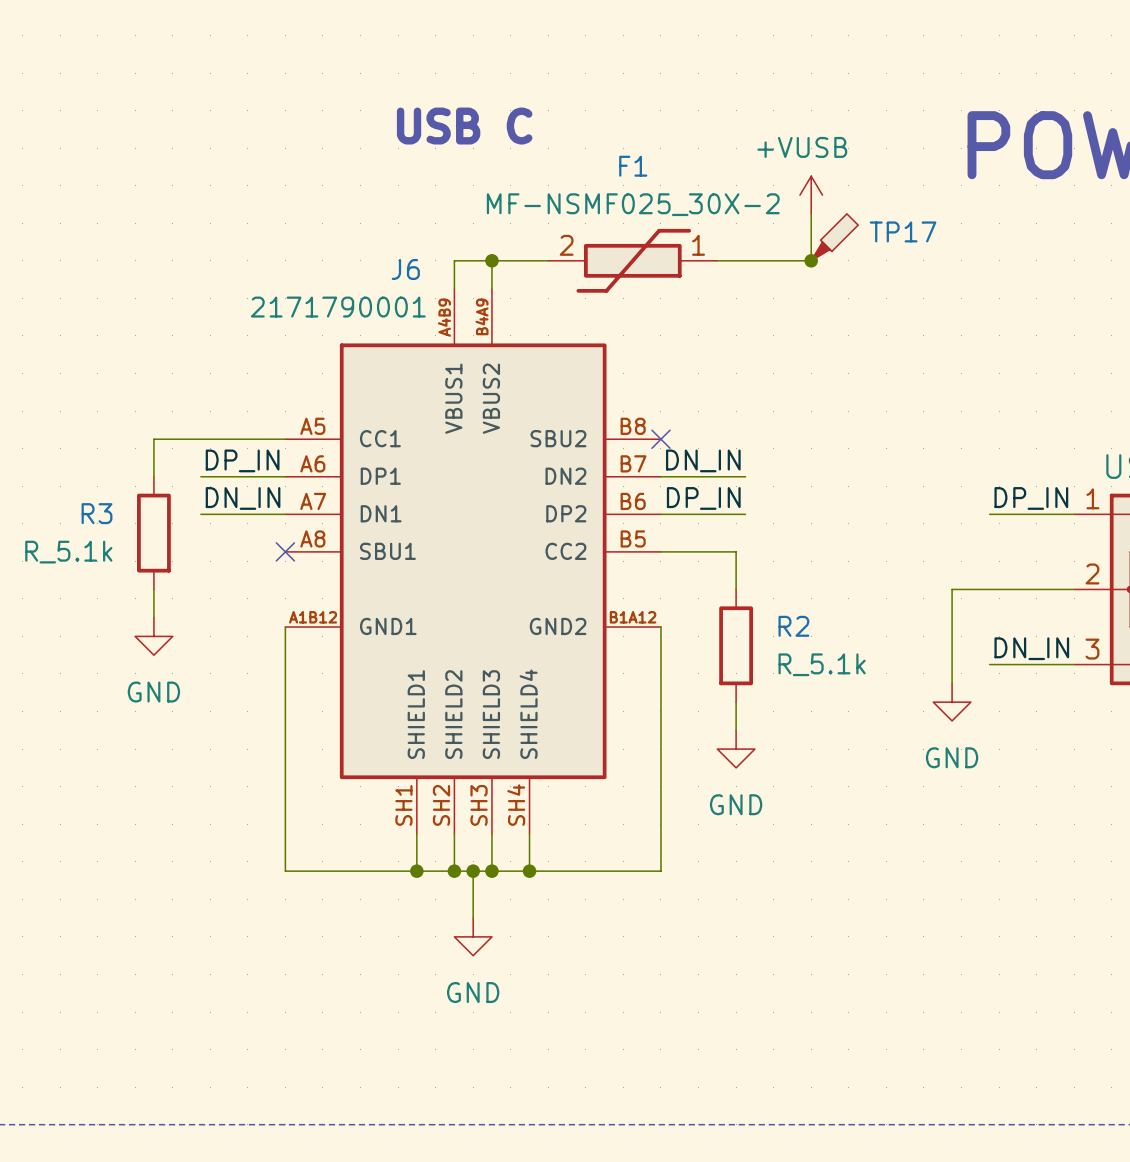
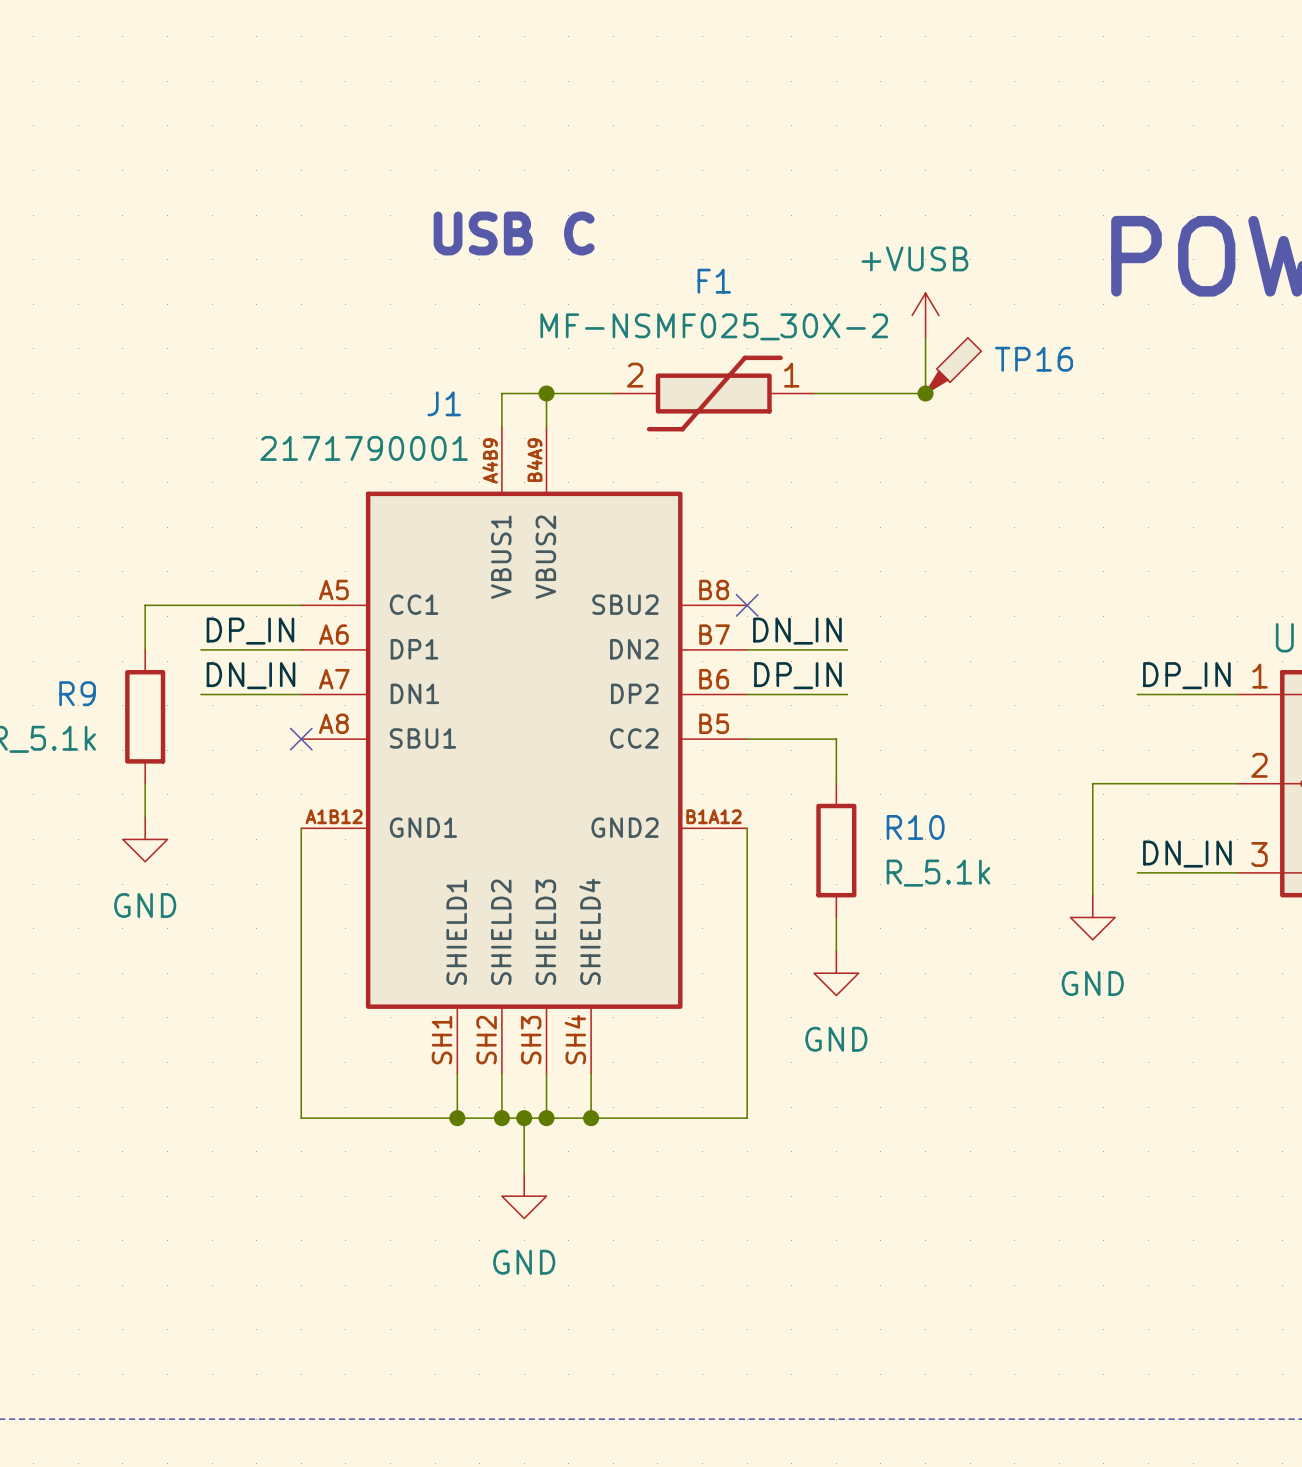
TP17 name: TP17 (903, 231) -> TP16 (1034, 359)
J6 name: J6 (405, 269) -> J1 (444, 403)
R3 name: R3 (96, 513) -> R9 (77, 693)
R2 name: R2 (793, 626) -> R10 (915, 827)

